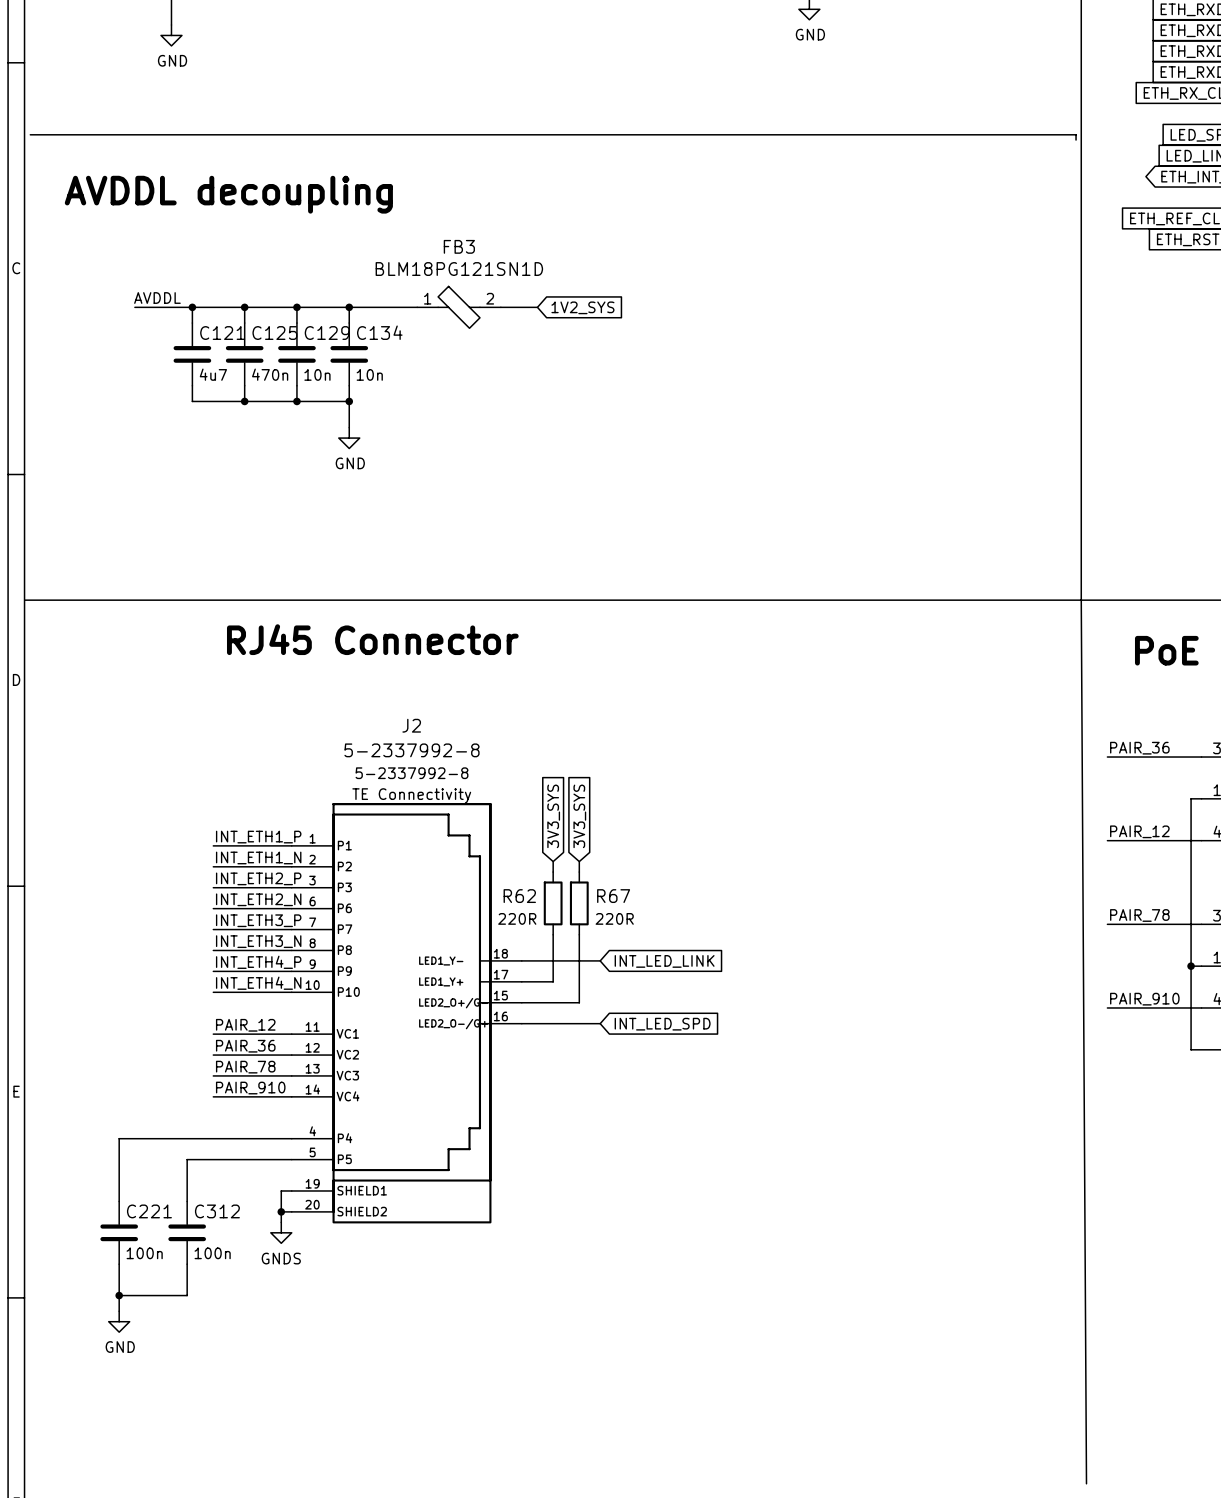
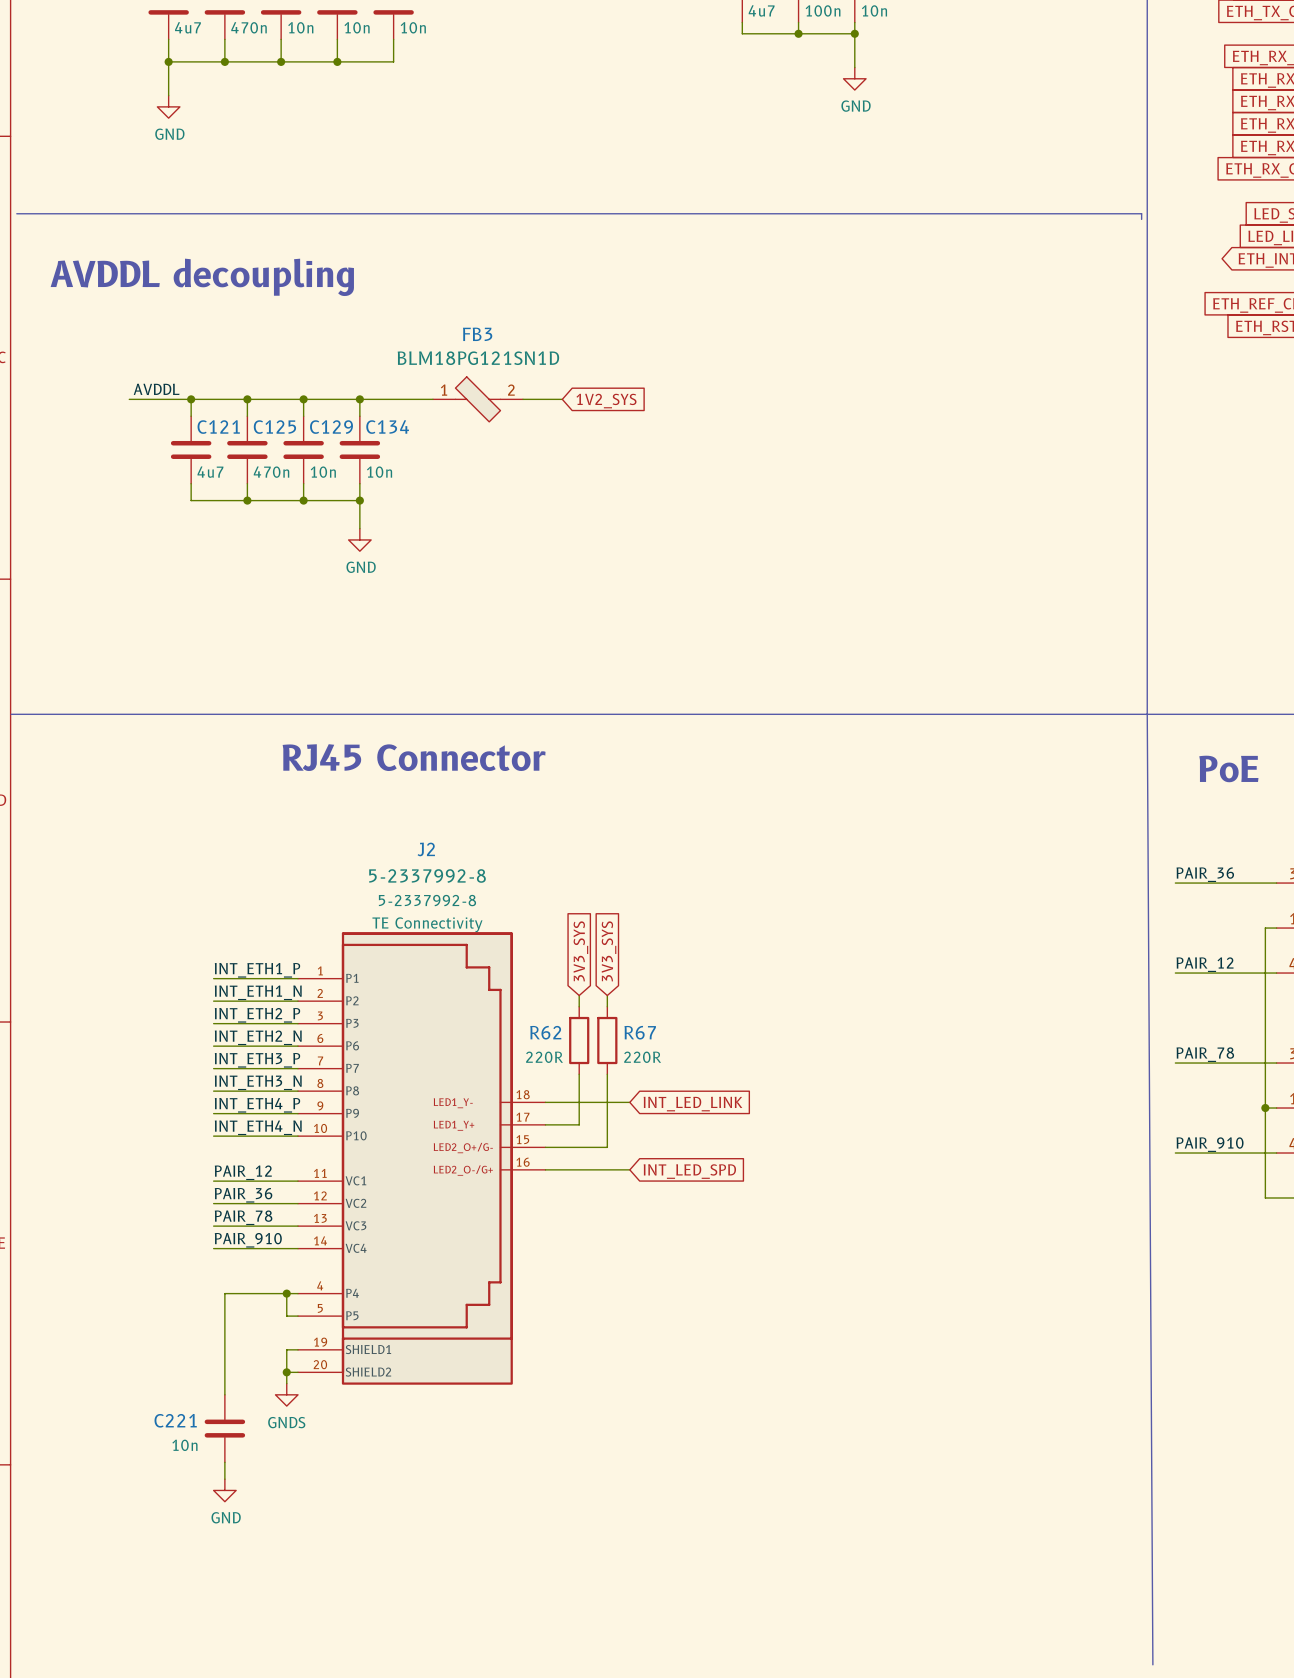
wire: (223, 1138) (119, 1138) (119, 1201) -> (224, 1293) (224, 1394)
junction: none -> (286, 1293)
wire: (281, 1159) (187, 1159) (187, 1201) -> (286, 1316) (286, 1293)
C221 name position: C221 (149, 1211) -> C221 (175, 1420)
C221 position: (119, 1232) -> (224, 1428)
C312: (187, 1232) -> none
C221 text: 100n (144, 1253) -> 10n (184, 1445)
wire: (119, 1264) (119, 1311) -> none
wire: (187, 1264) (187, 1295) (119, 1295) -> none
junction: (119, 1295) -> none
wire: none -> (224, 1462) (224, 1479)
power symbol position: GND (119, 1321) -> GND (224, 1490)

